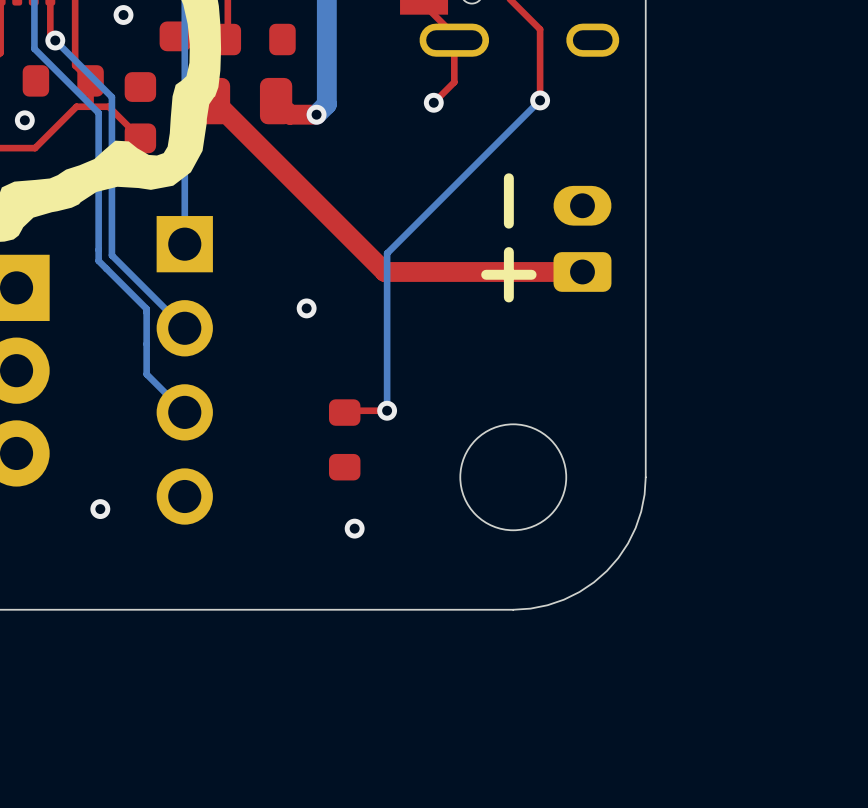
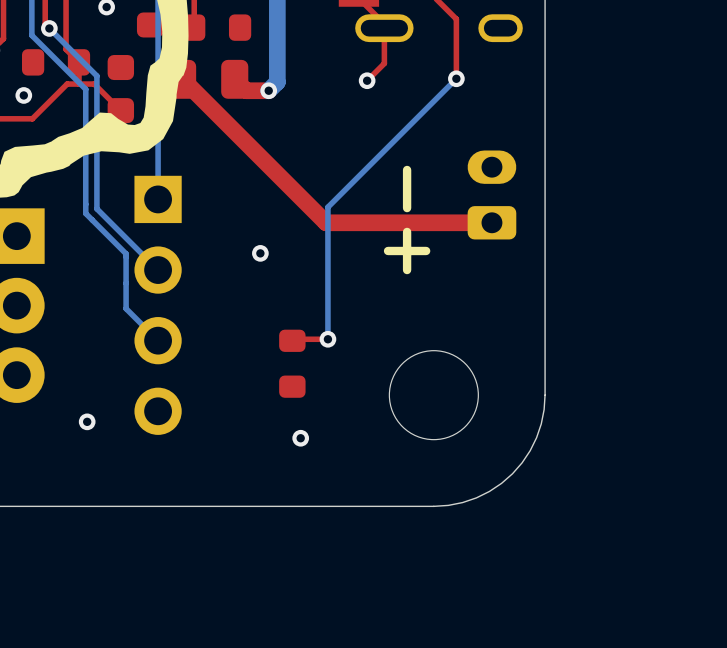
text position: +- (508, 237) -> +- (407, 220)

